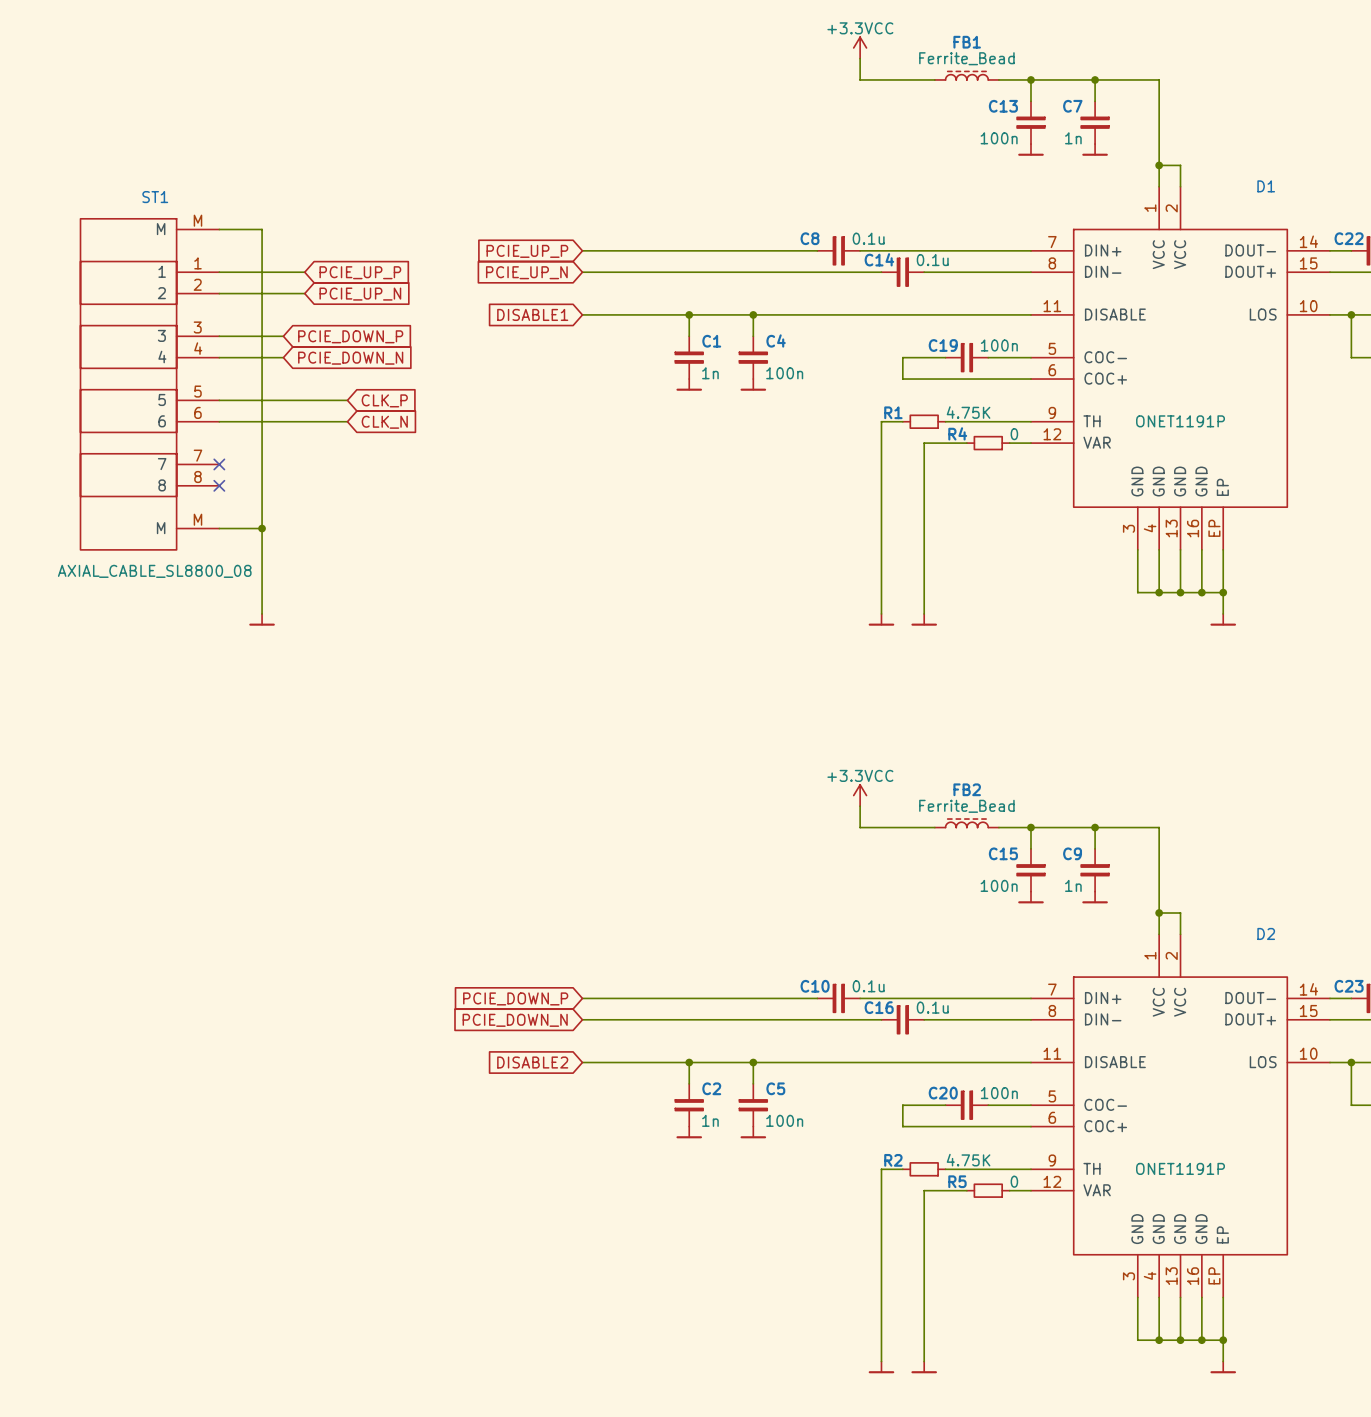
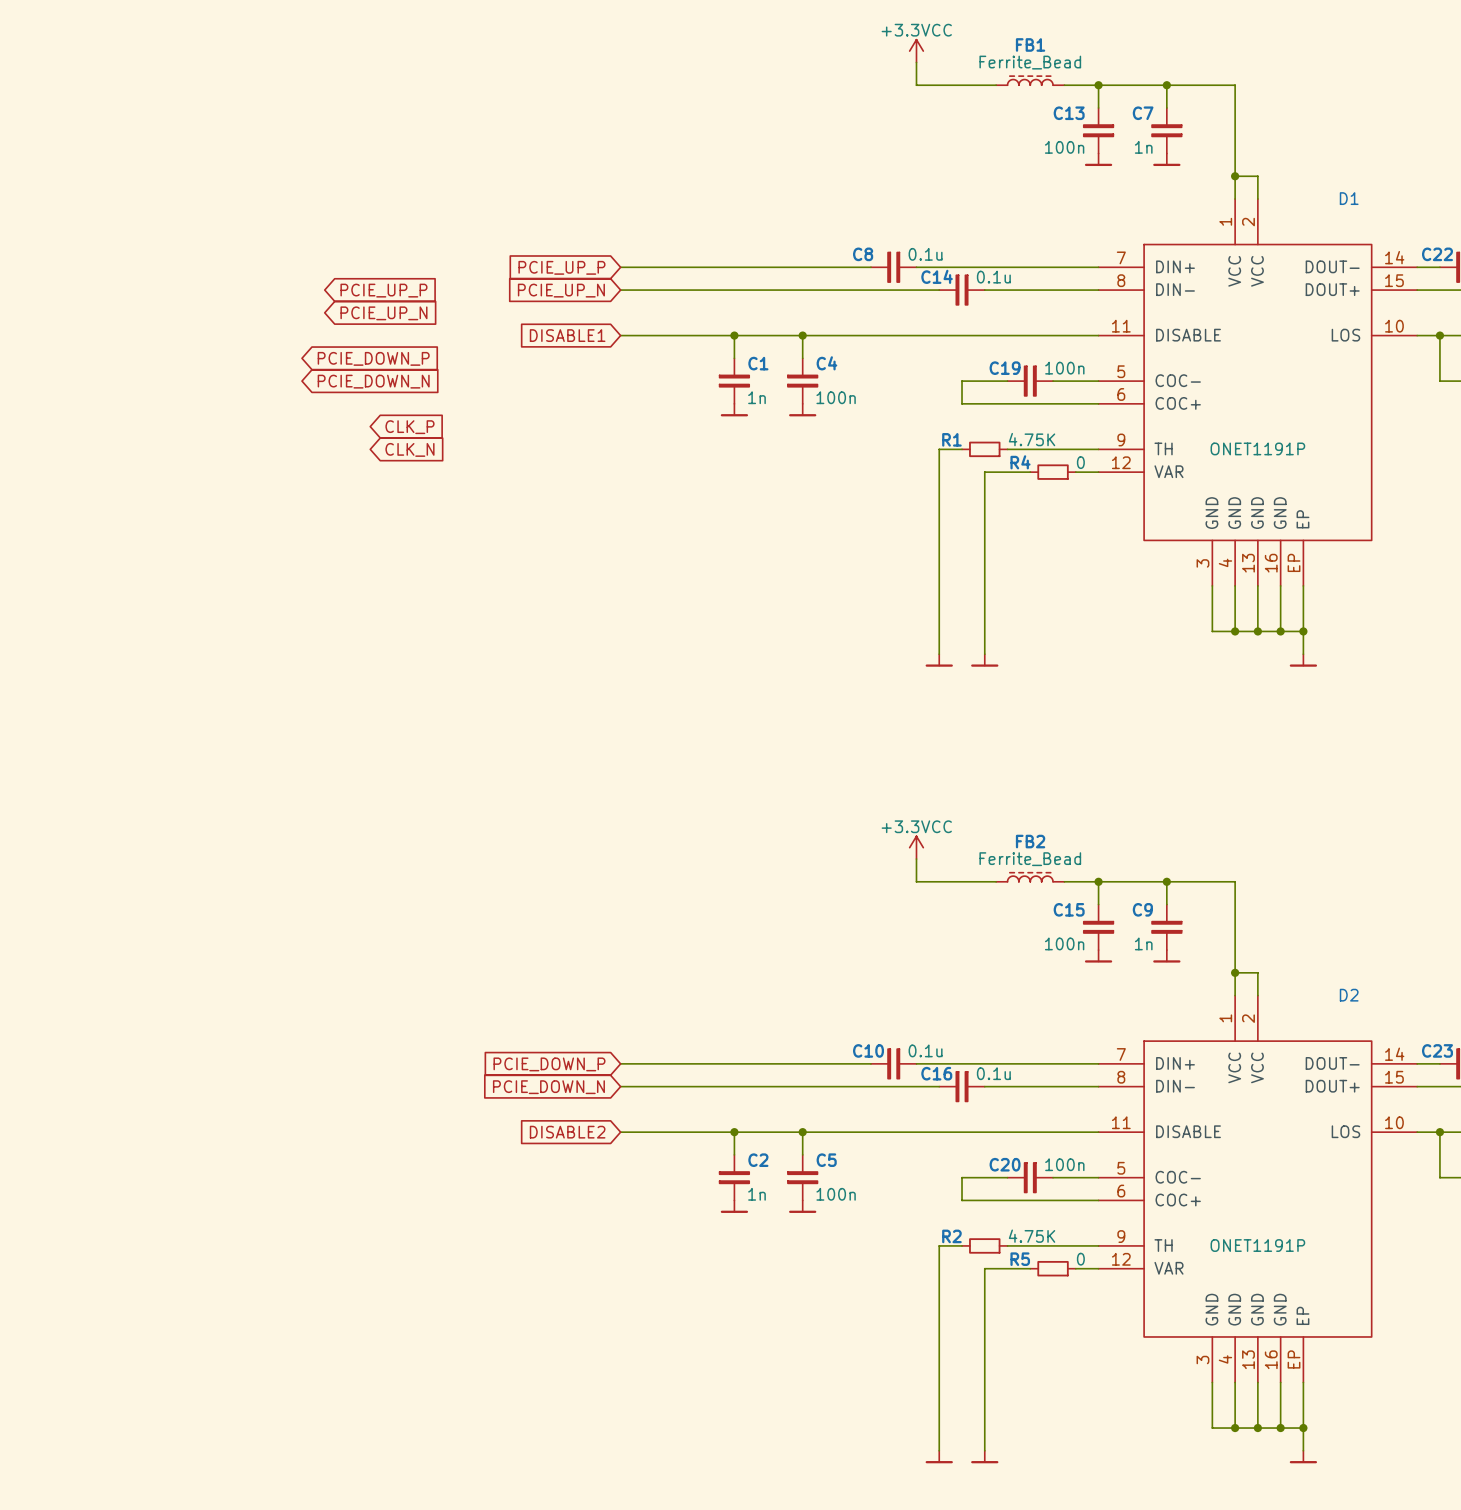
wire: (219, 229) (262, 229) (262, 613) -> none
wire: (219, 272) (304, 272) -> none
wire: (219, 293) (304, 293) -> none
wire: (219, 336) (283, 336) -> none
wire: (219, 357) (283, 357) -> none
ST1: AXIAL_CABLE_SL8800_08 (149, 384) -> none
wire: (219, 400) (347, 400) -> none
wire: (219, 421) (347, 421) -> none
no-connect mark: (219, 464) -> none
no-connect mark: (219, 485) -> none
wire: (219, 528) (262, 528) -> none
junction: (262, 528) -> none
power symbol: (262, 619) -> none

